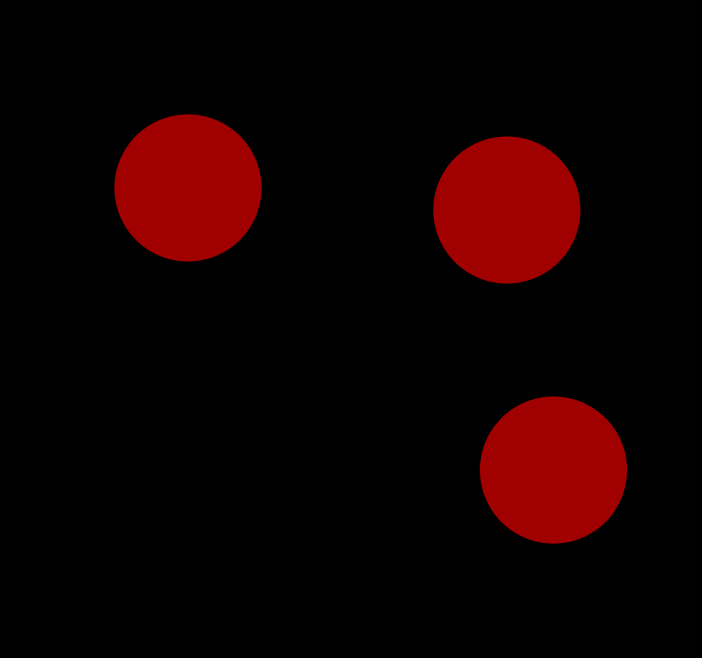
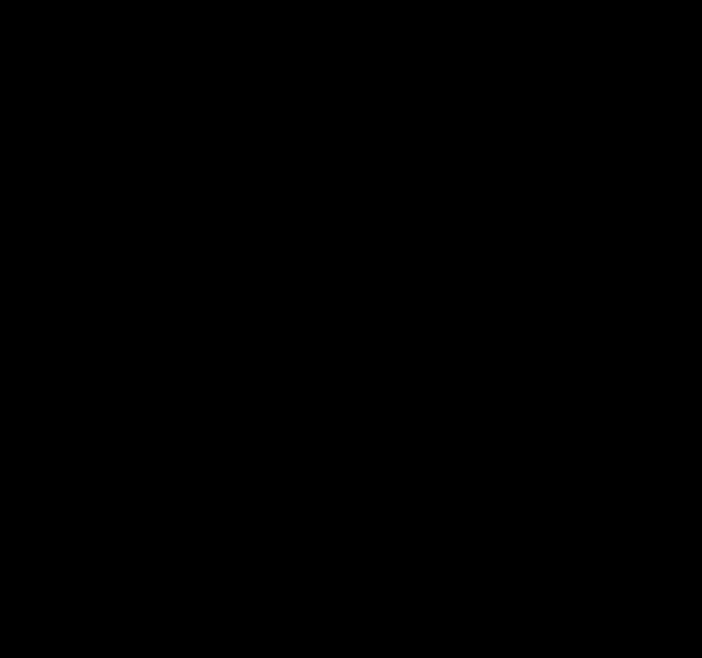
part: (187, 187) -> none
part: (506, 210) -> none
part: (553, 470) -> none

